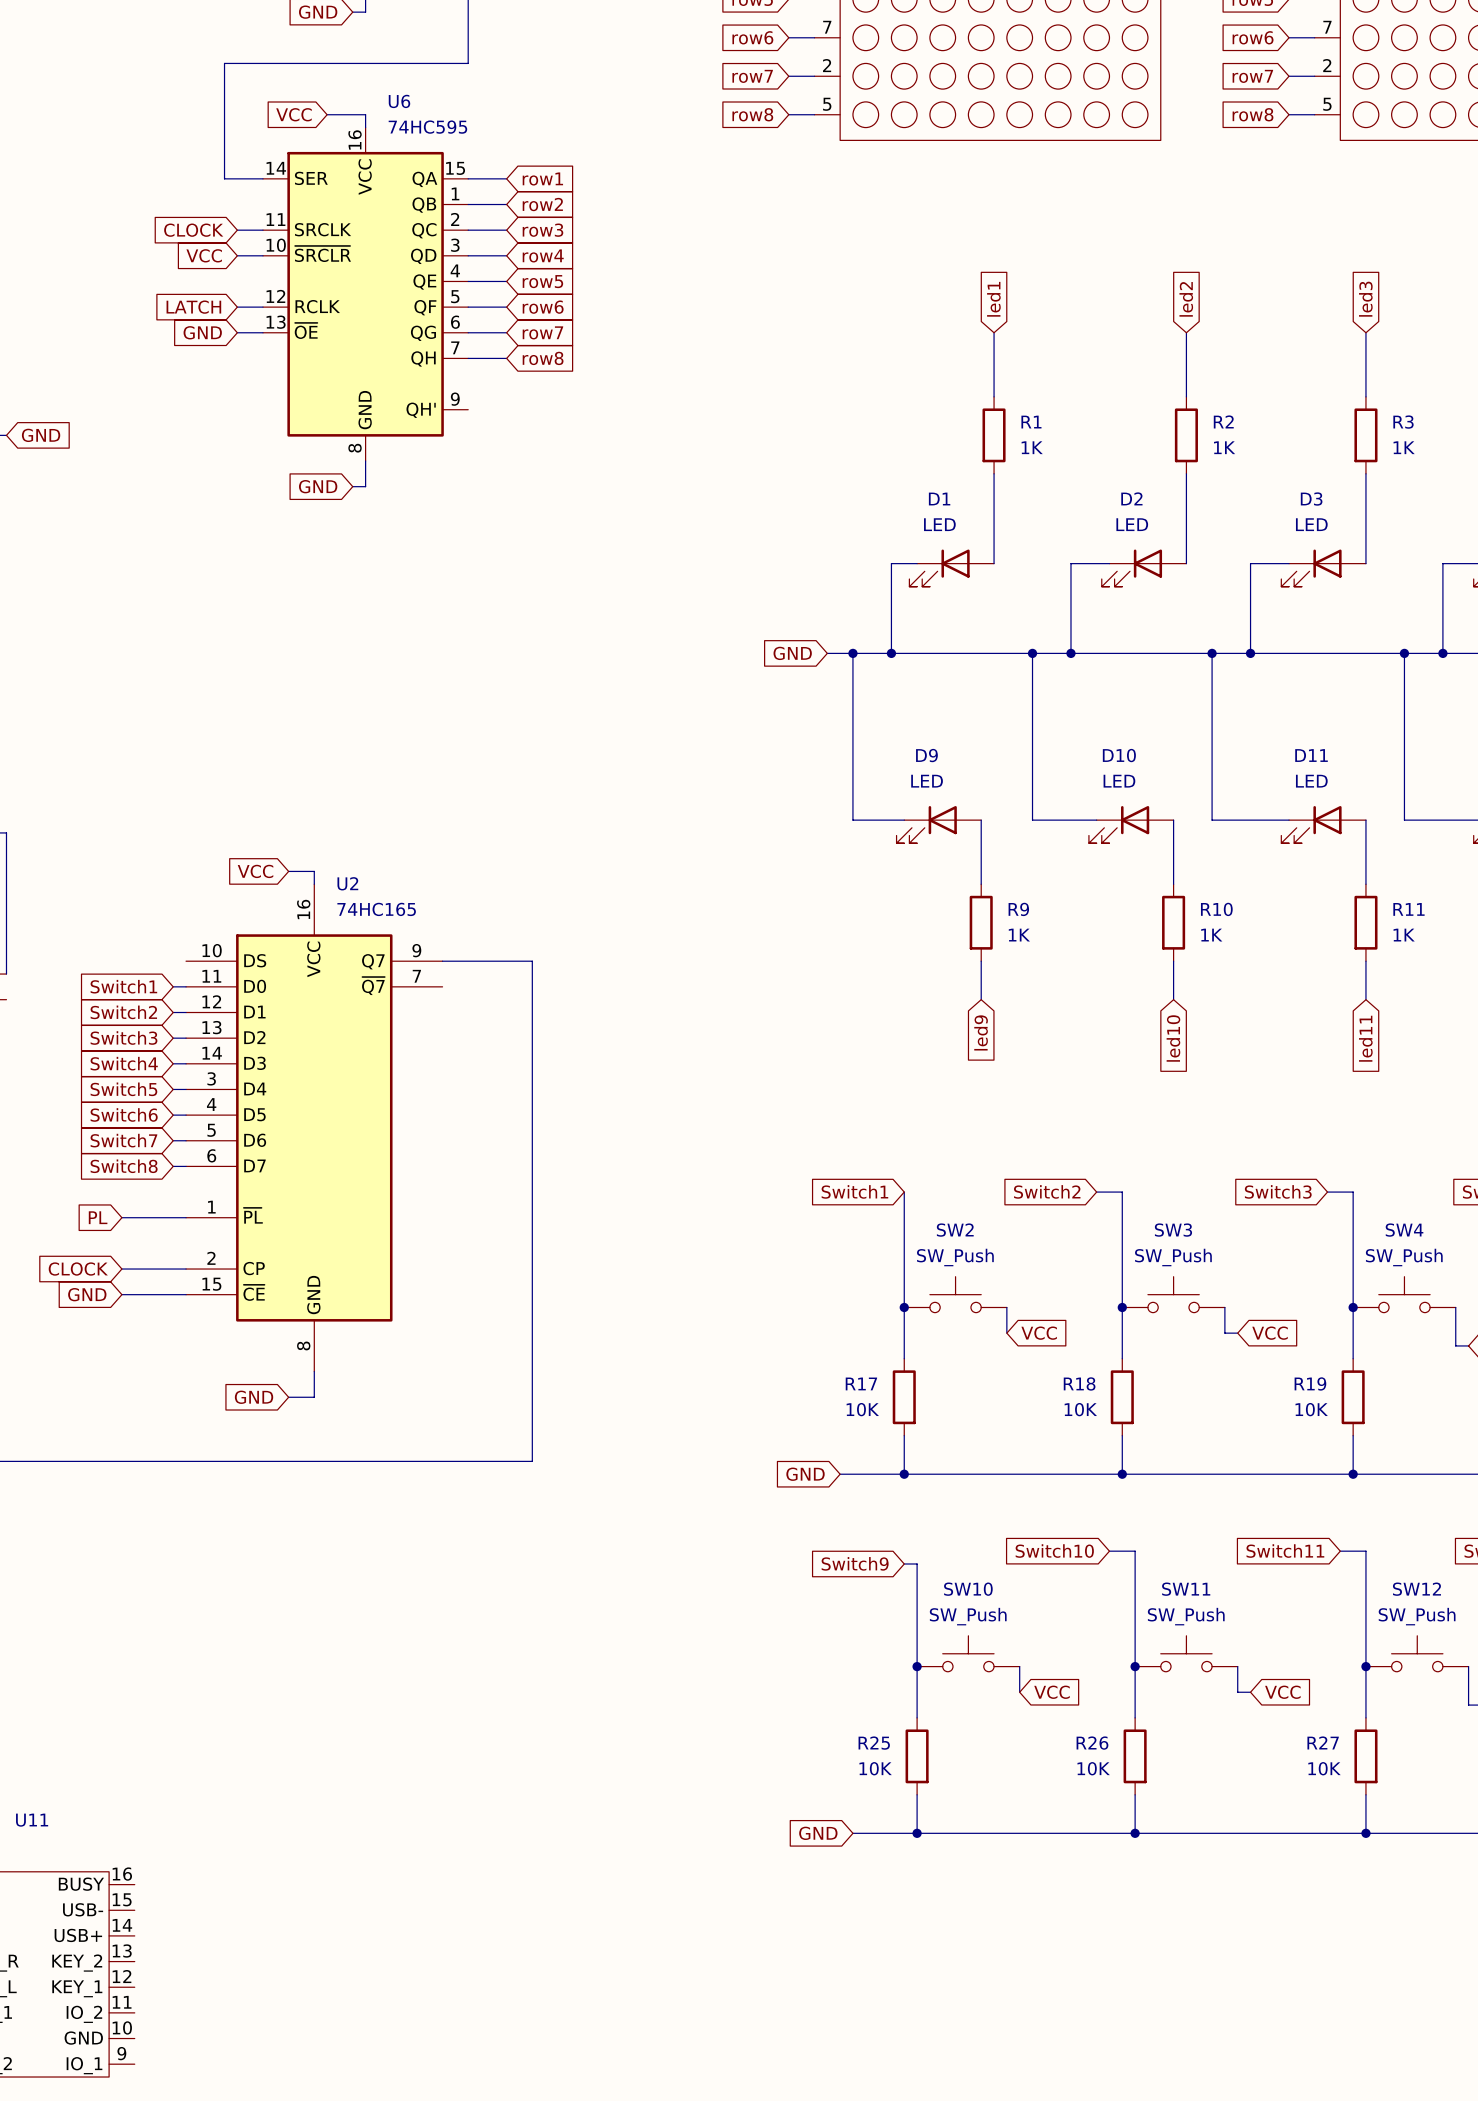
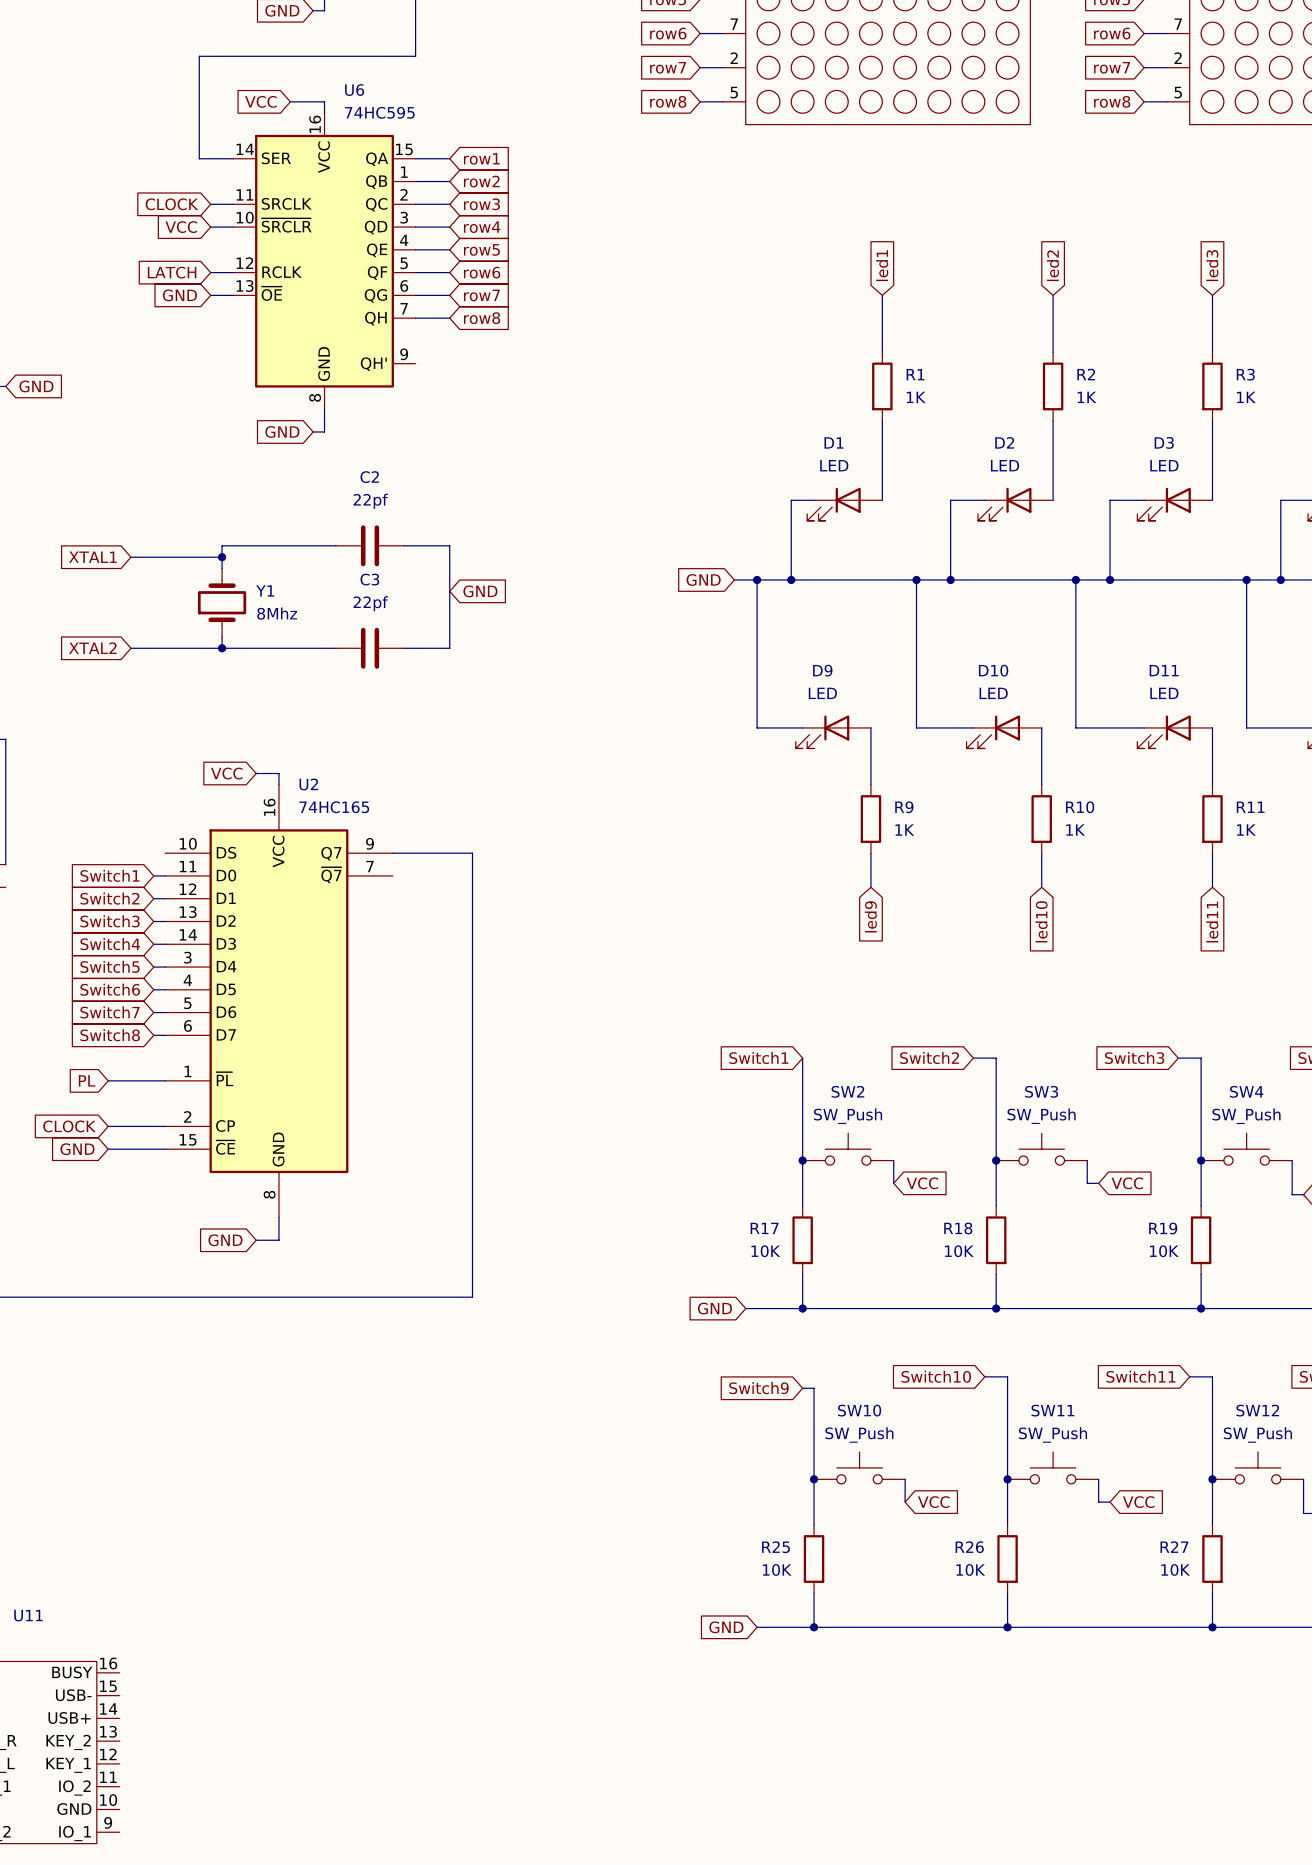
wire: none -> (335, 545) (222, 545) (222, 568)
C2: none -> 22pf (370, 545)
wire: none -> (404, 545) (449, 545) (449, 648) (404, 648)
global label: none -> XTAL1 (92, 557)
wire: none -> (130, 557) (222, 557)
junction: none -> (222, 557)
global label: none -> GND (480, 591)
Y1: none -> 8Mhz (222, 602)
wire: none -> (222, 636) (222, 648)
global label: none -> XTAL2 (92, 648)
wire: none -> (130, 648) (335, 648)
junction: none -> (222, 648)
C3: none -> 22pf (370, 648)

